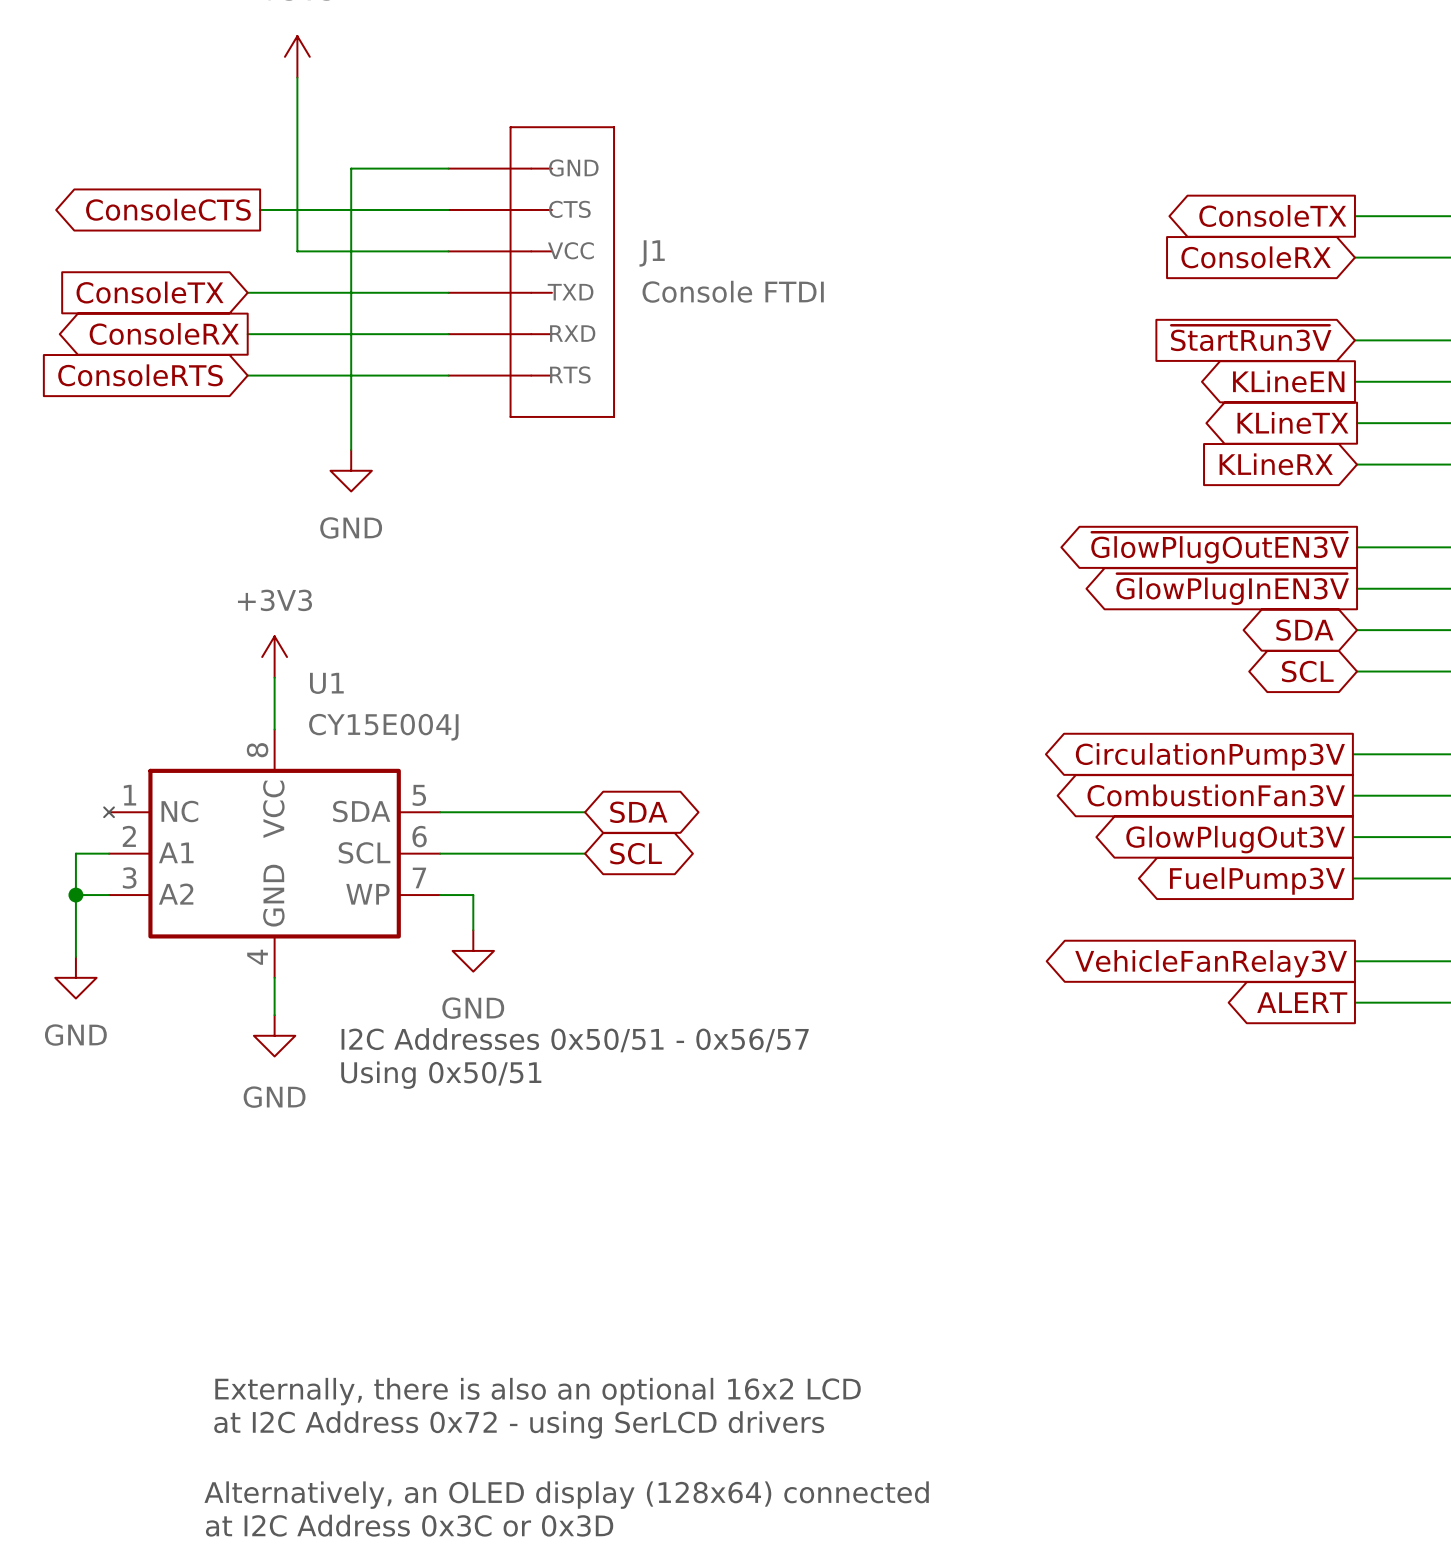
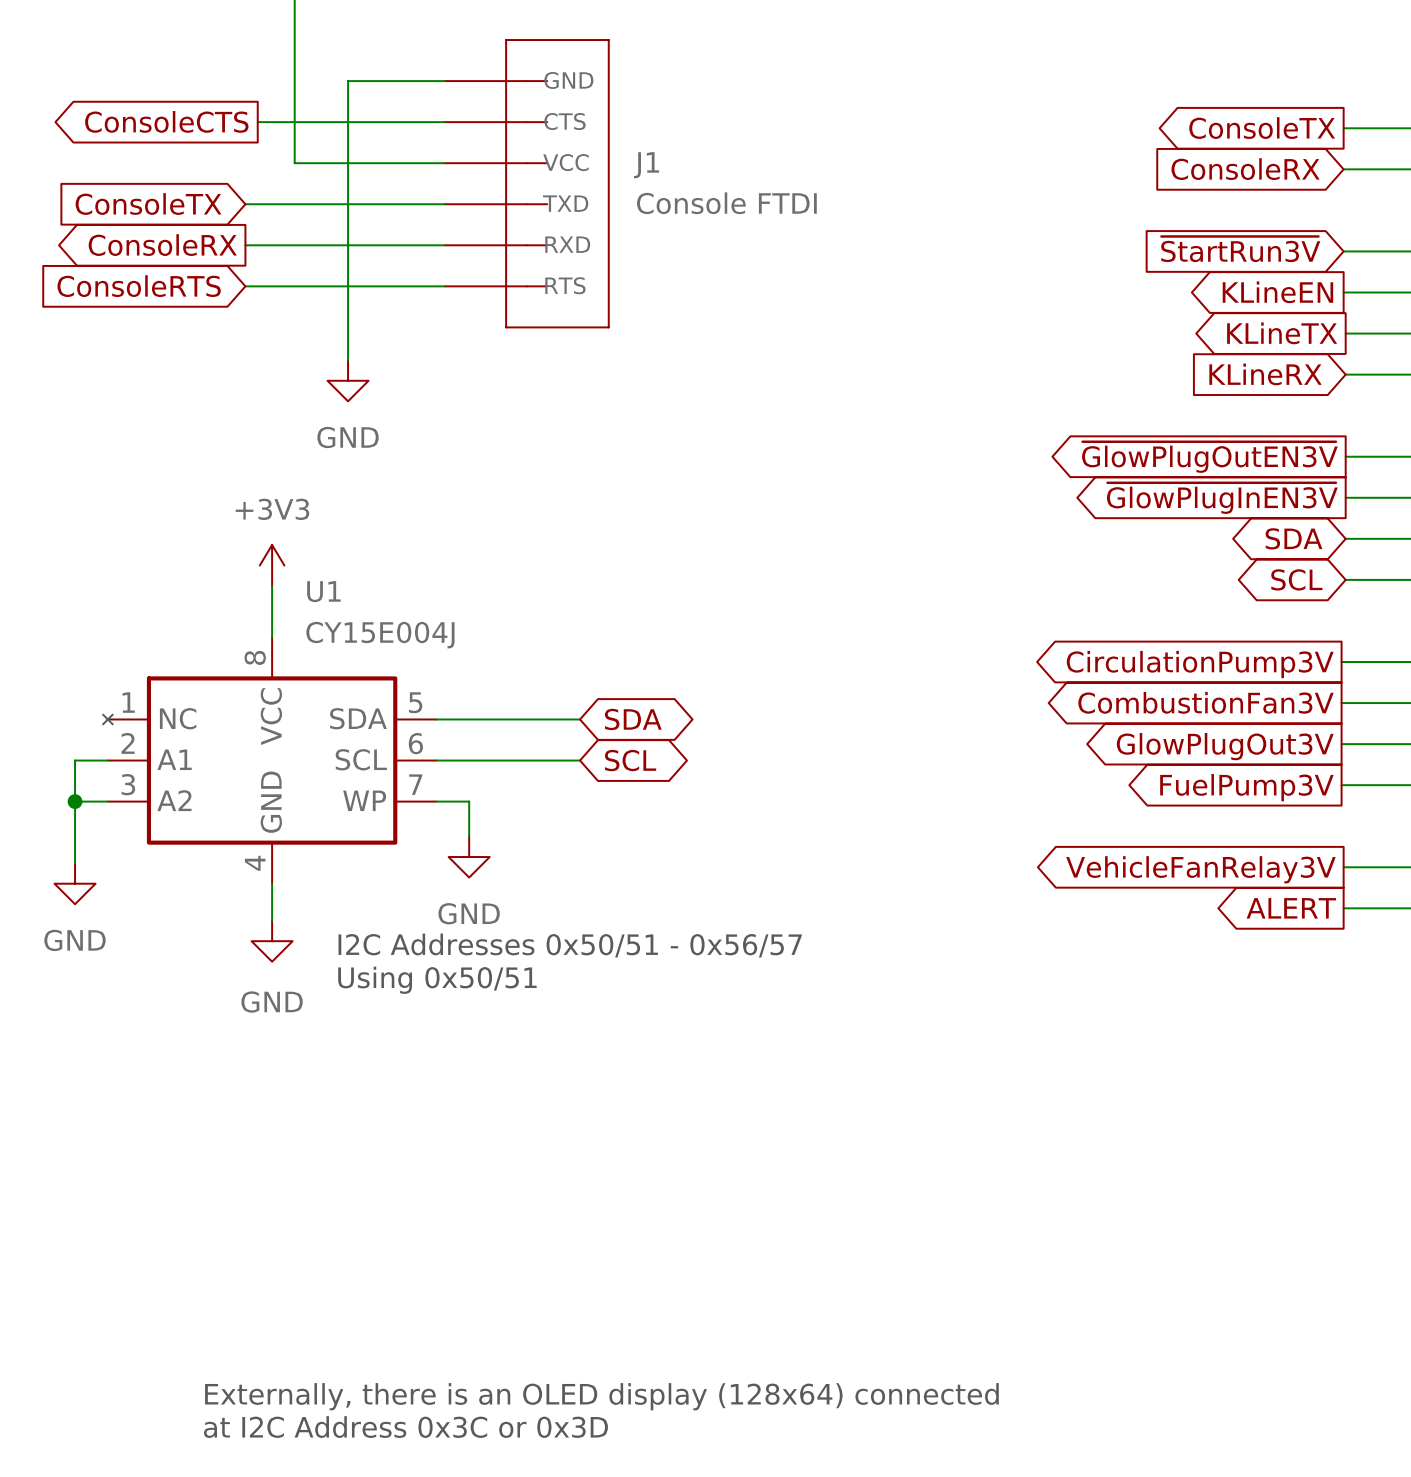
text: Externally, there is also an optional 16x2 LCD (538, 1391) -> none
text: at I2C Address 0x72 - using SerLCD drivers (519, 1424) -> none
text: Alternatively, an OLED display (128x64) connected (566, 1495) -> Externally, there is an OLED display (128x64) connected (601, 1396)

